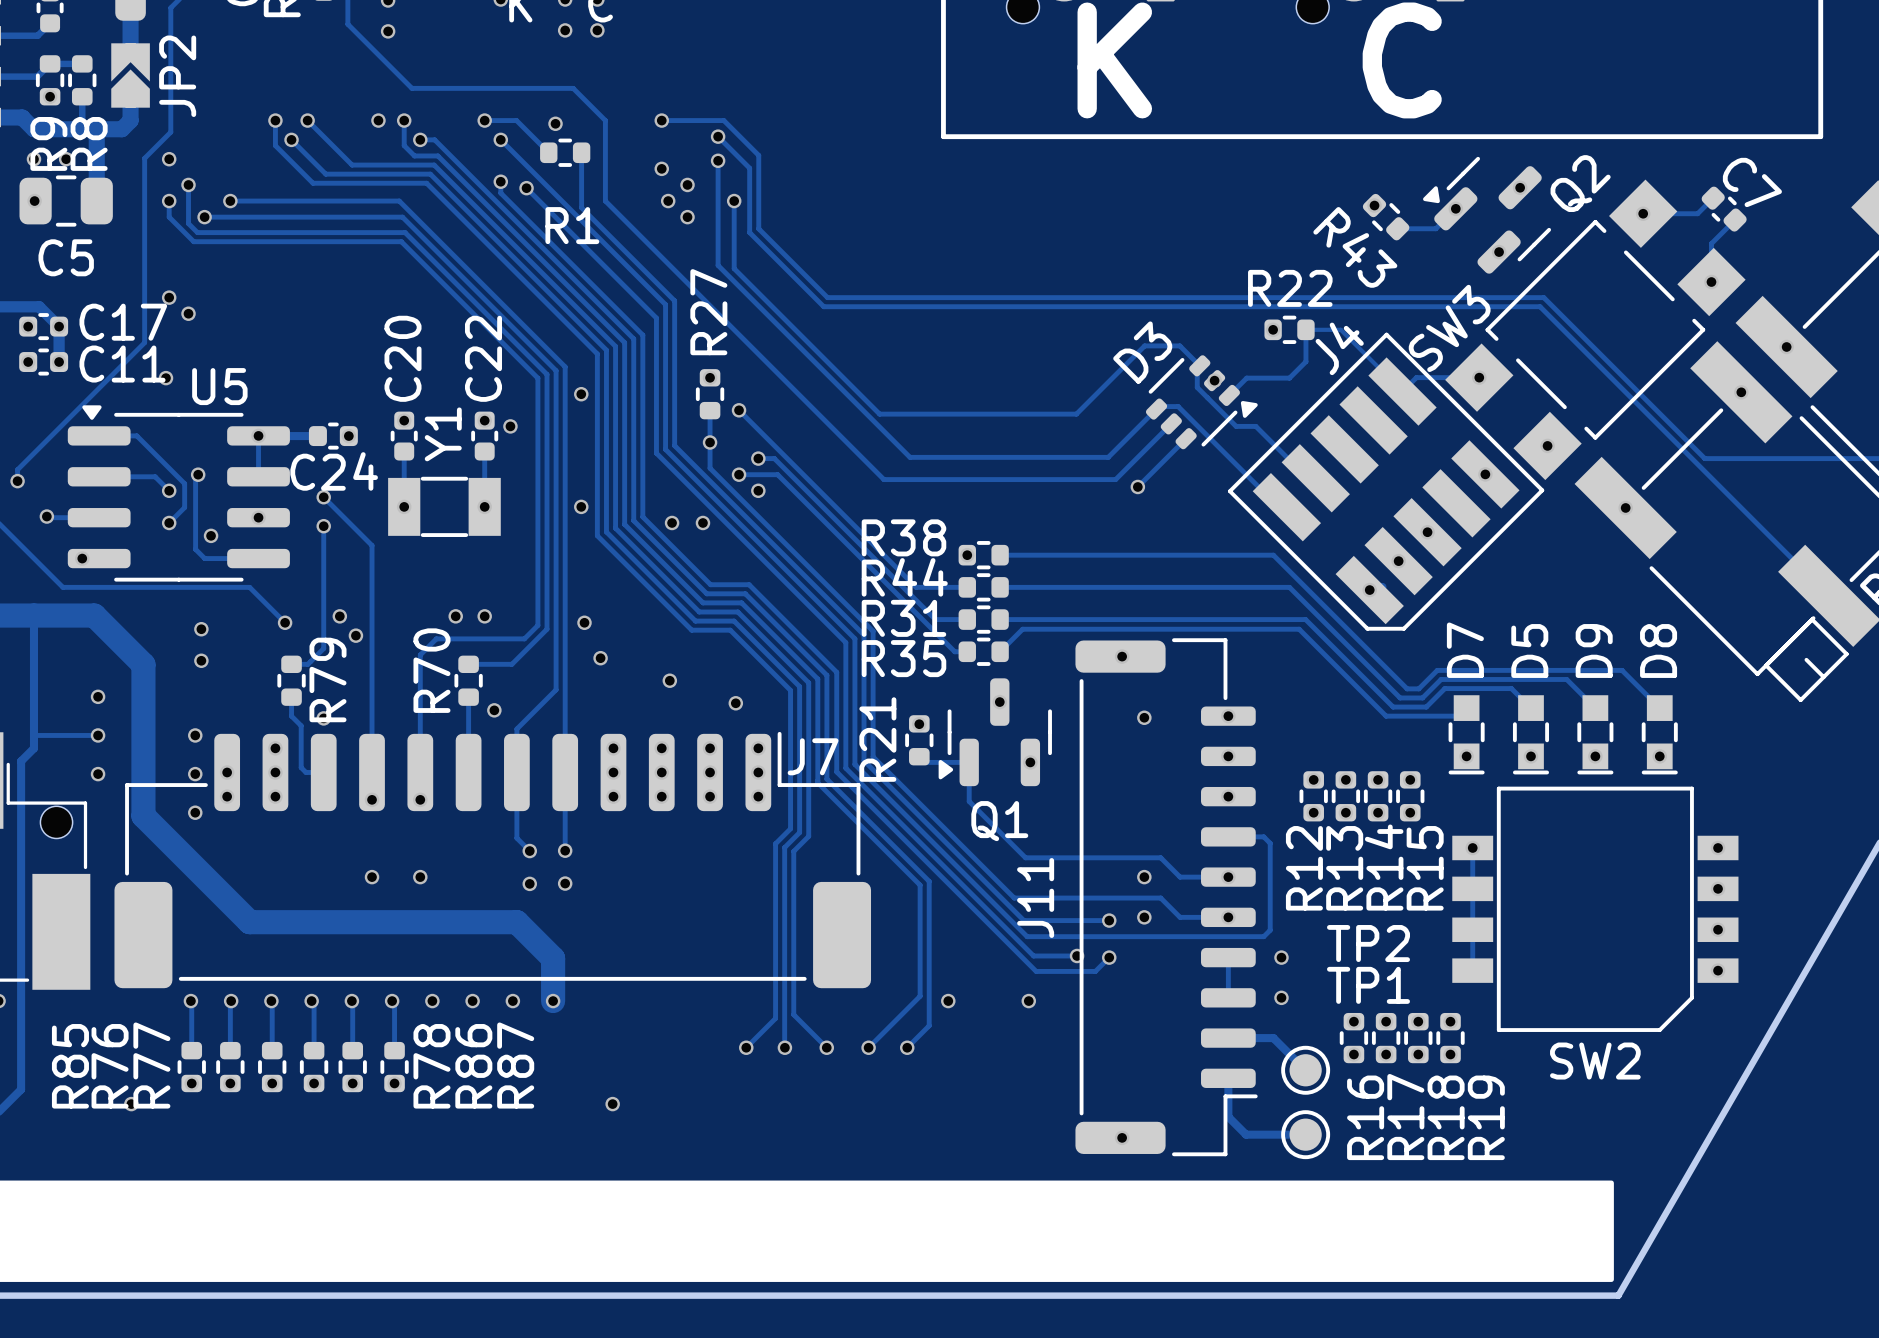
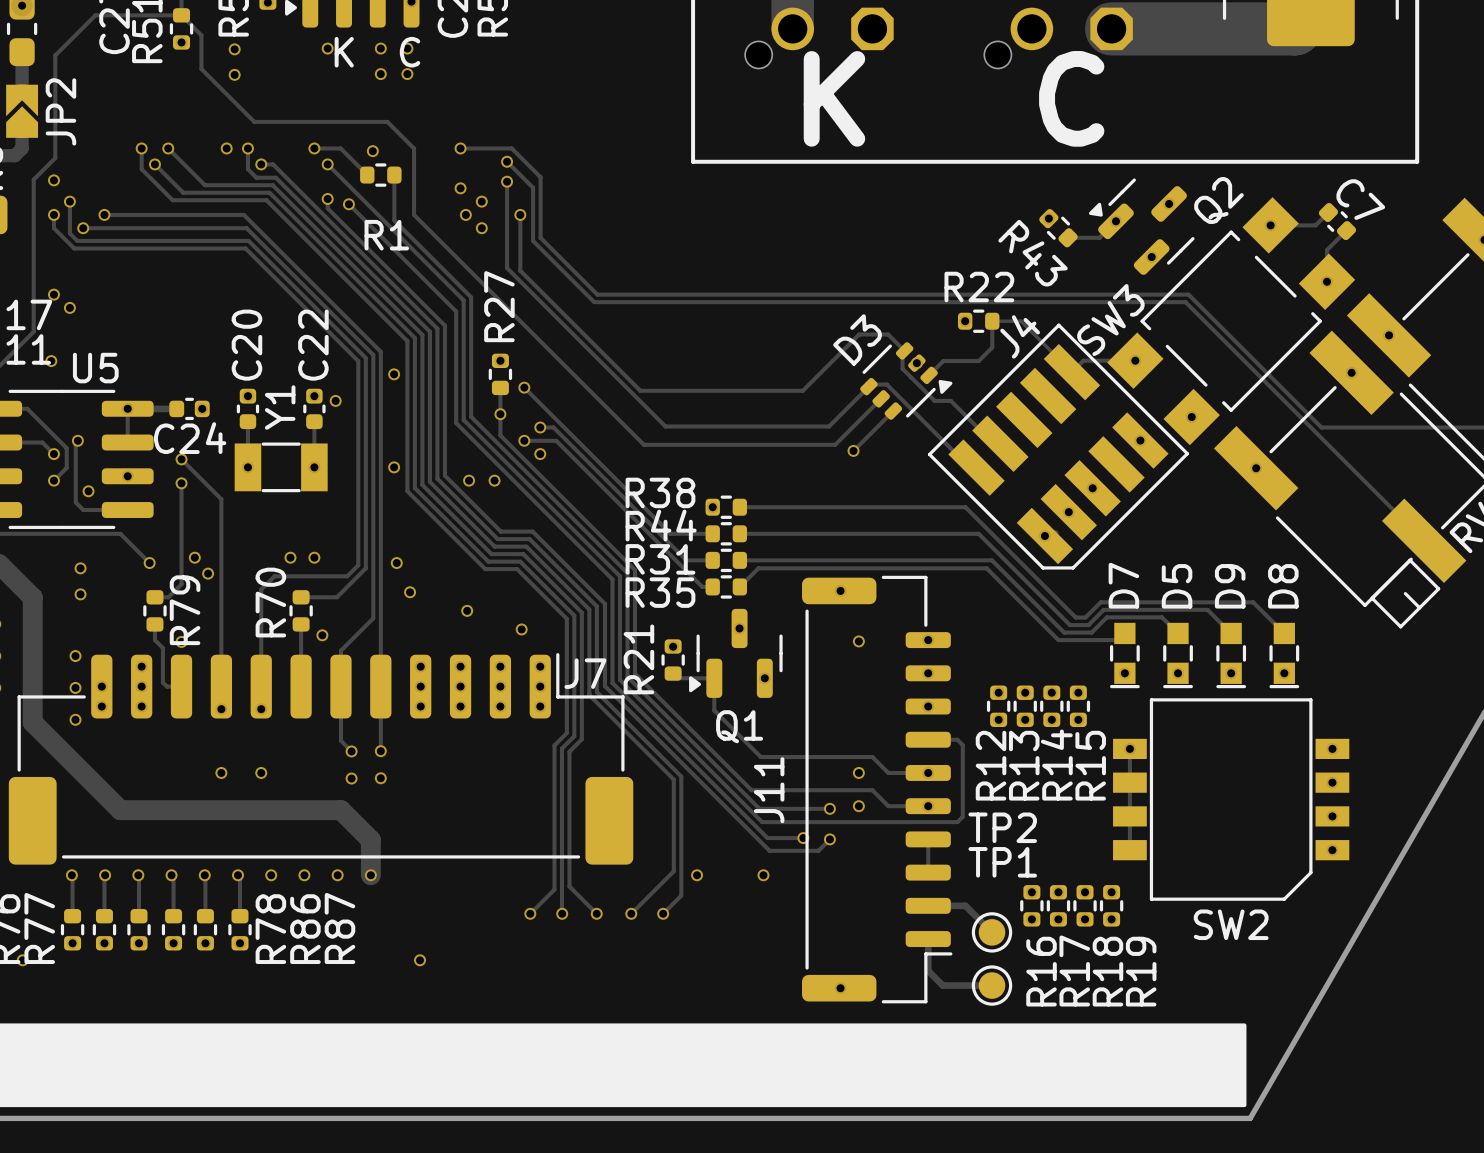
TP2 name position: TP2 (1368, 943) -> TP2 (1002, 827)
via: (1281, 957) -> none
TP1 name position: TP1 (1368, 985) -> TP1 (1002, 862)
via: (1281, 997) -> none

